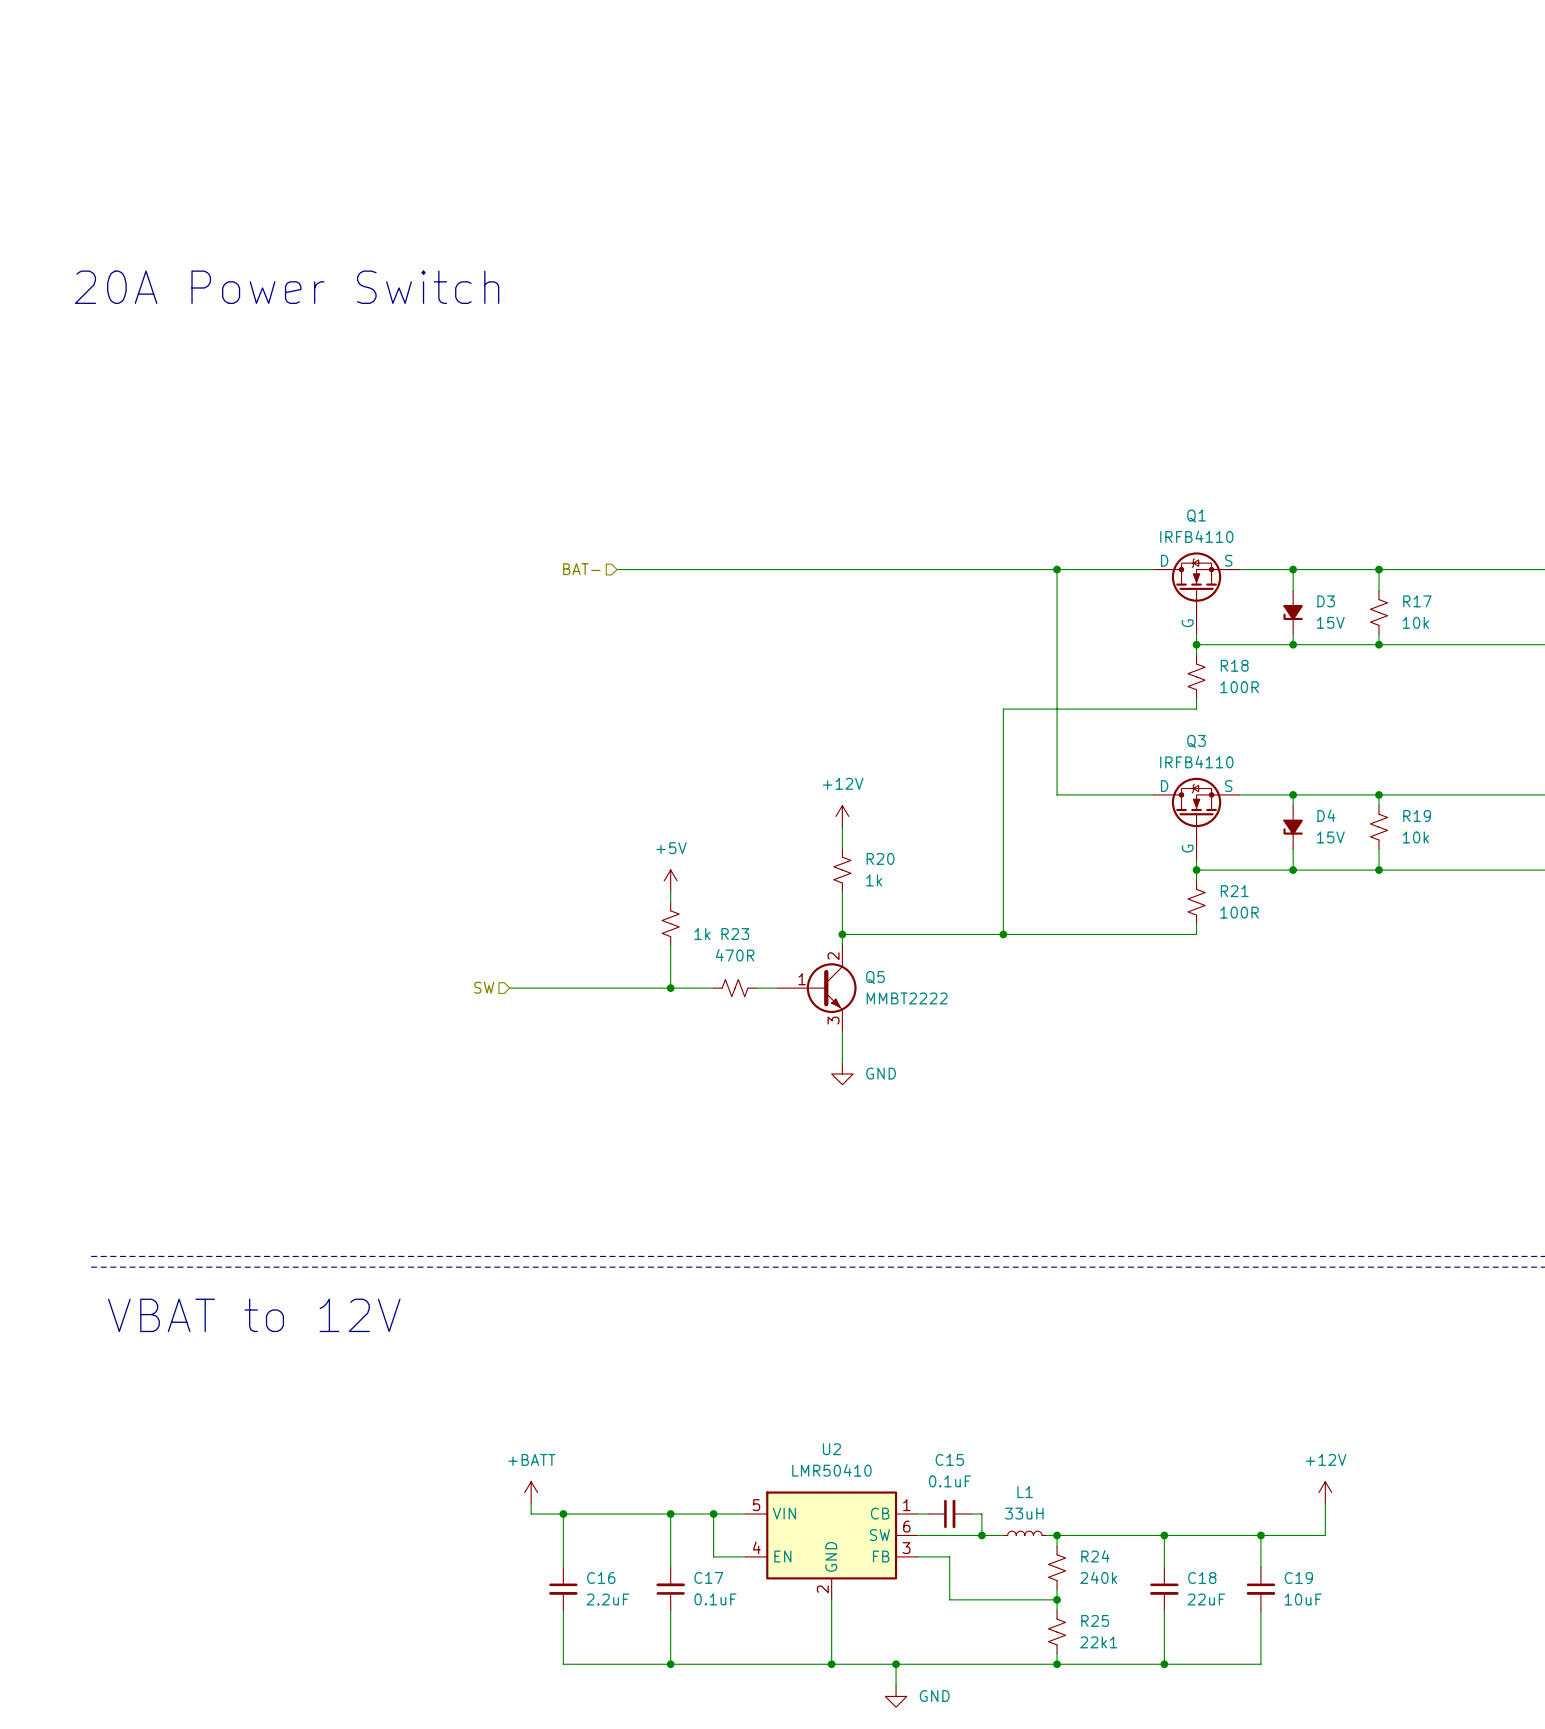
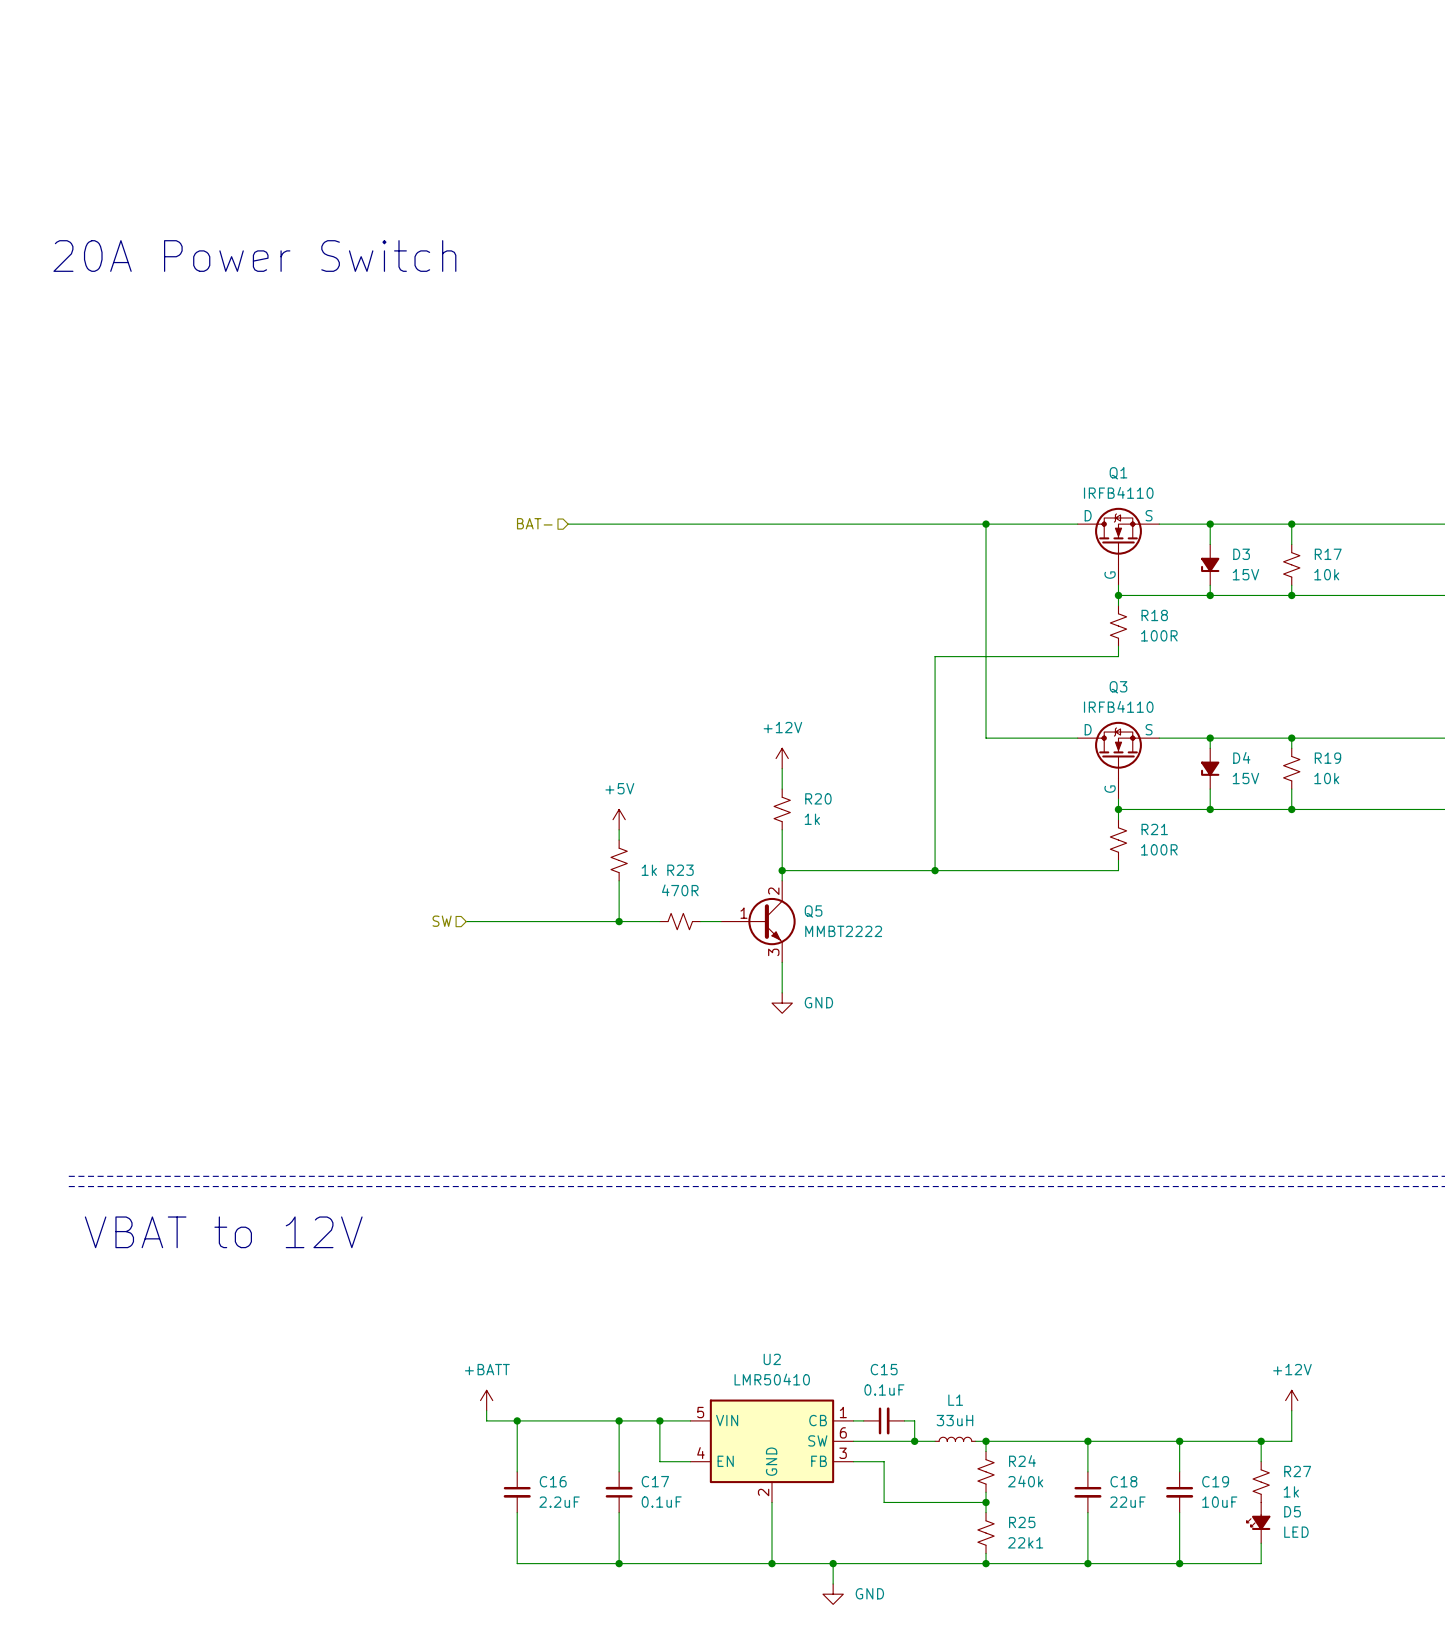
power symbol position: +12V (1325, 1492) -> +12V (1291, 1400)
wire: (1325, 1503) (1325, 1535) -> (1291, 1410) (1291, 1441) (1240, 1441)
wire: none -> (1261, 1441) (1261, 1461)
junction: none -> (1261, 1441)
R27: none -> 1k (1261, 1482)
D5: none -> LED (1258, 1522)
wire: none -> (1261, 1543) (1261, 1563) (1179, 1563)
junction: none -> (1179, 1563)

